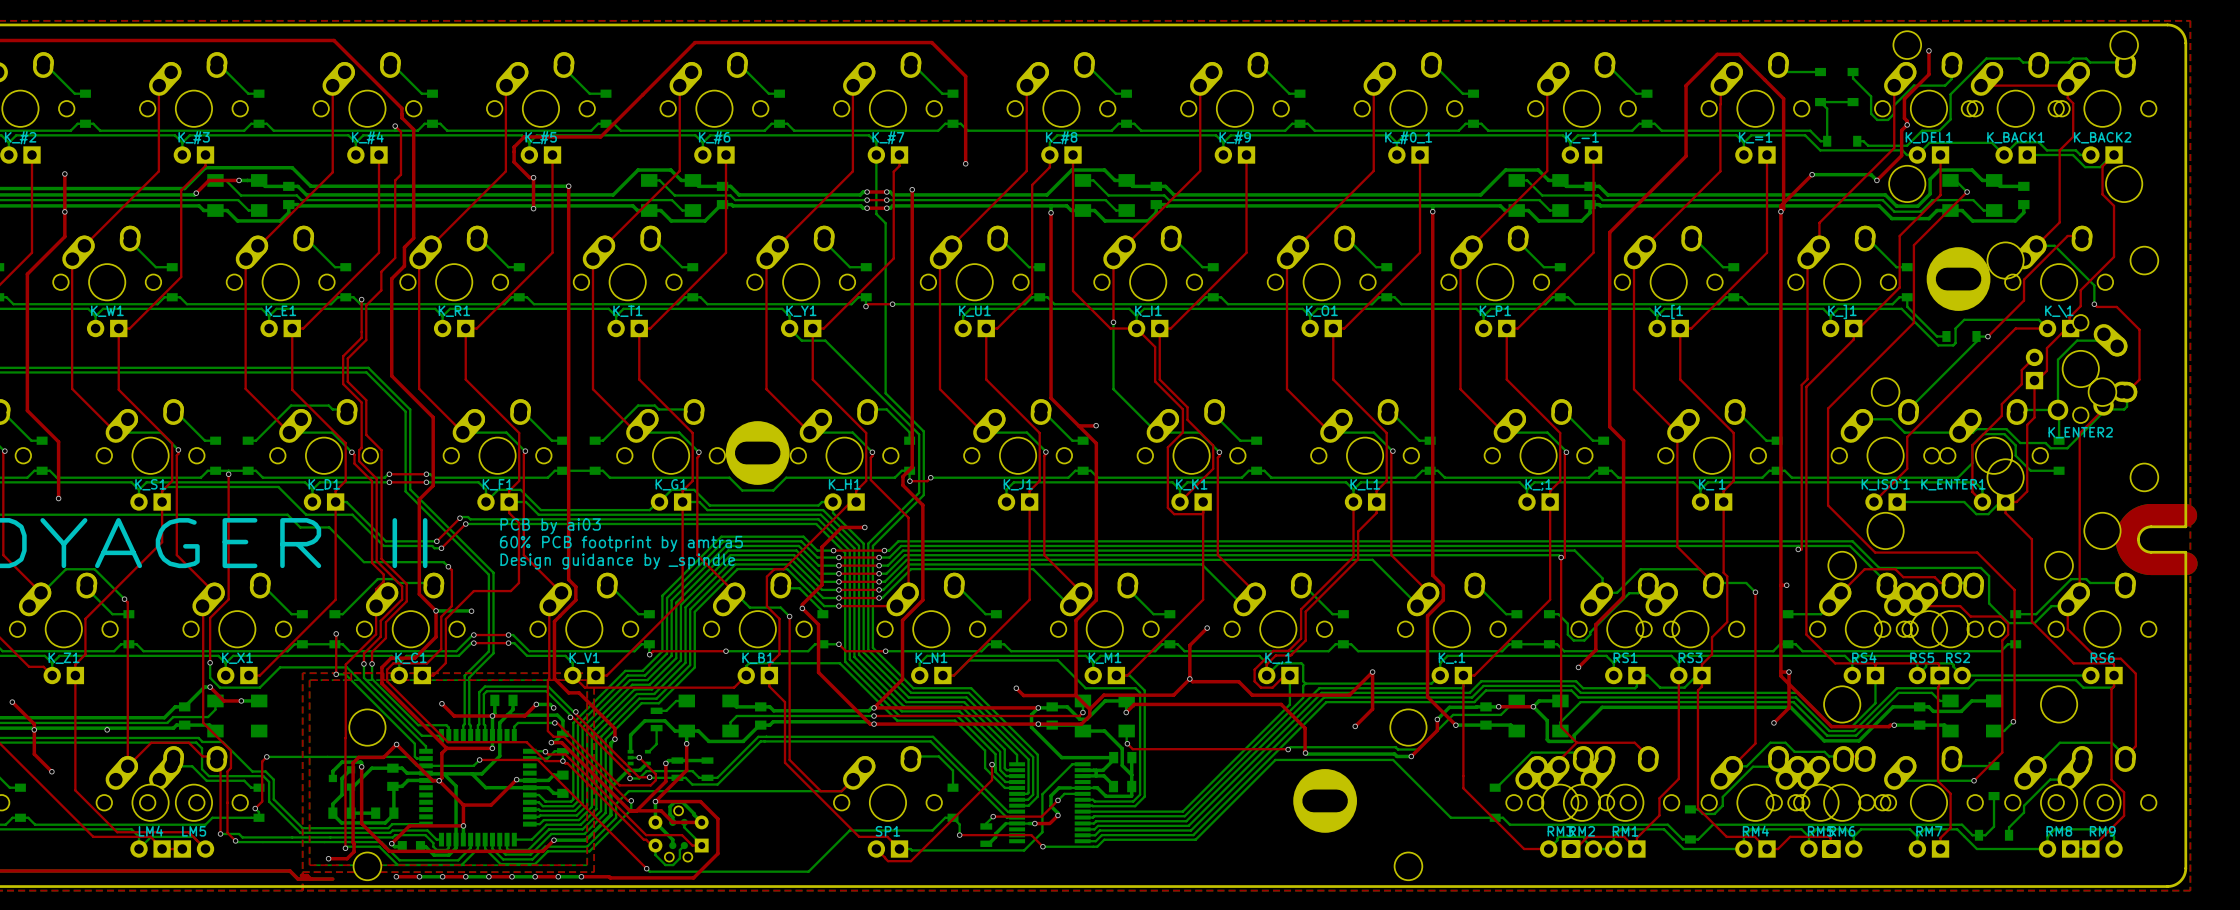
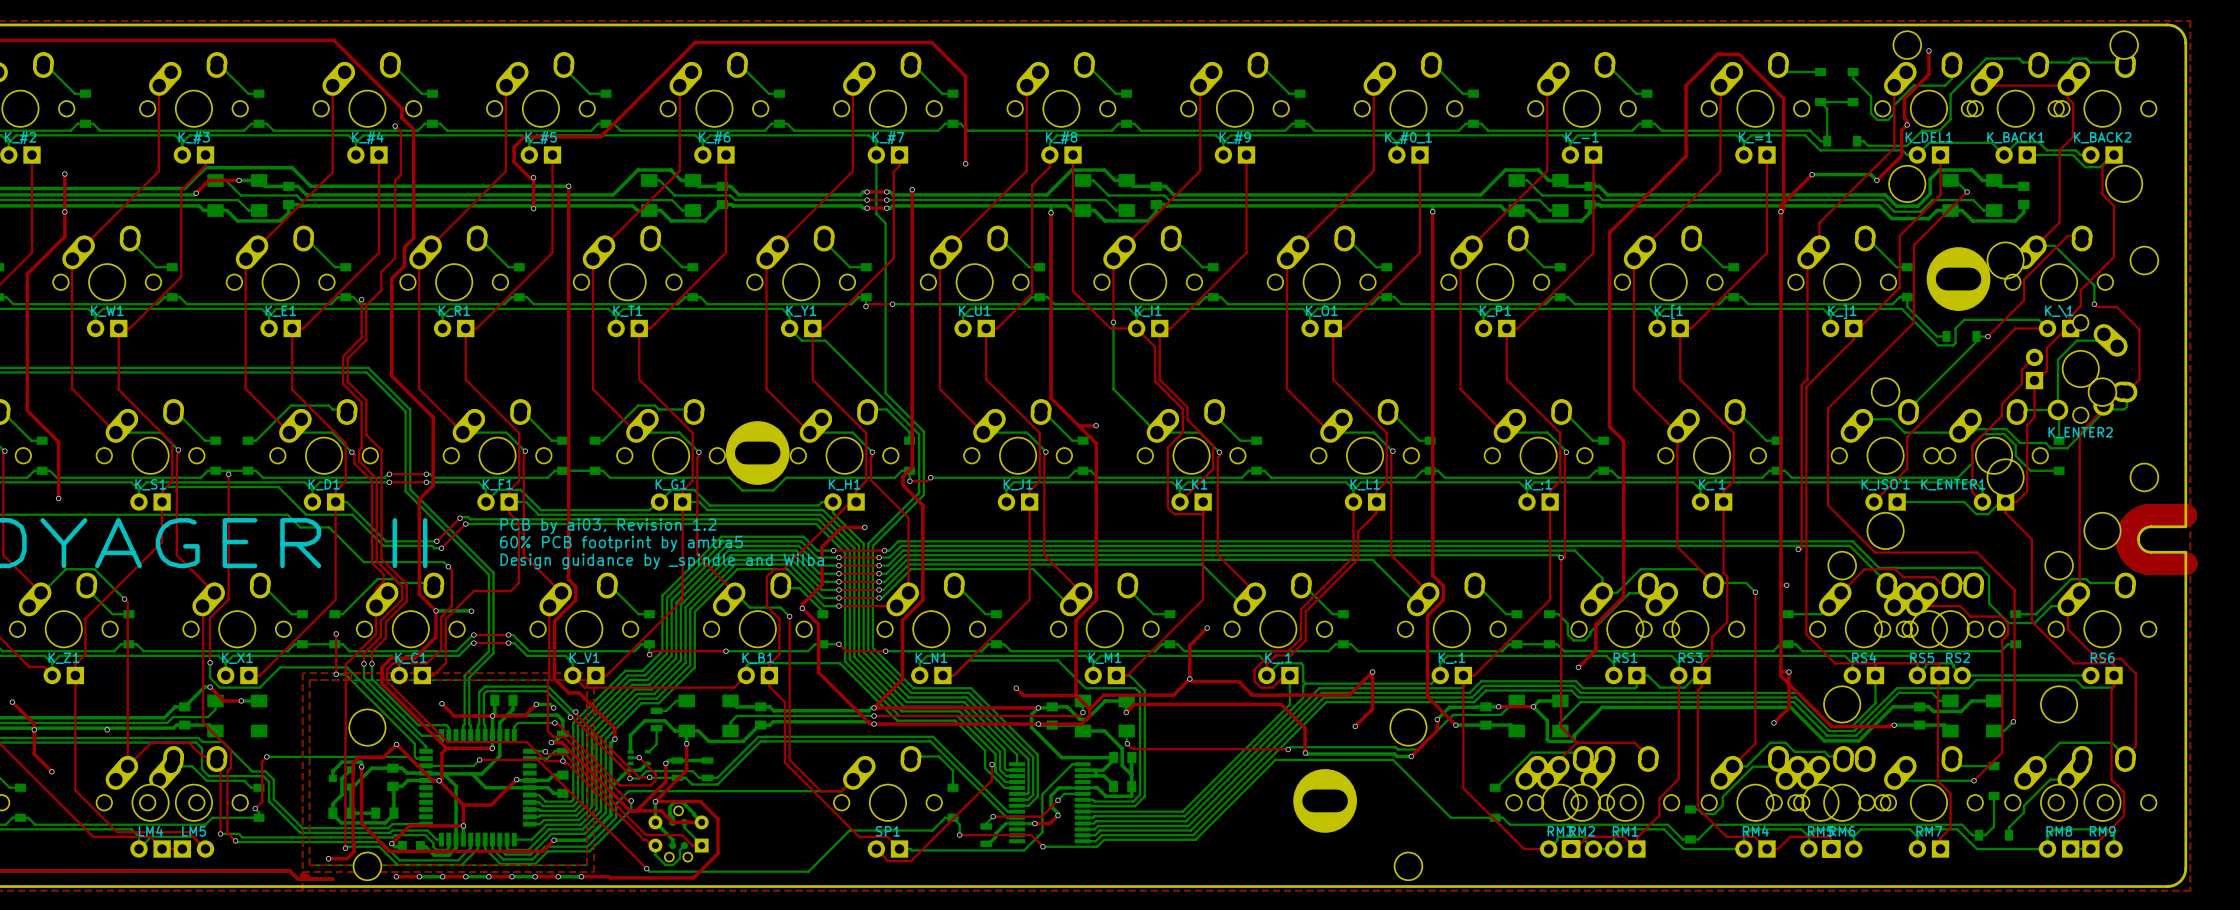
text: PCB by ai03 (550, 526) -> PCB by ai03, Revision 1.2 (608, 526)
text: Design guidance by _spindle (617, 561) -> Design guidance by _spindle and Wilba (662, 561)

